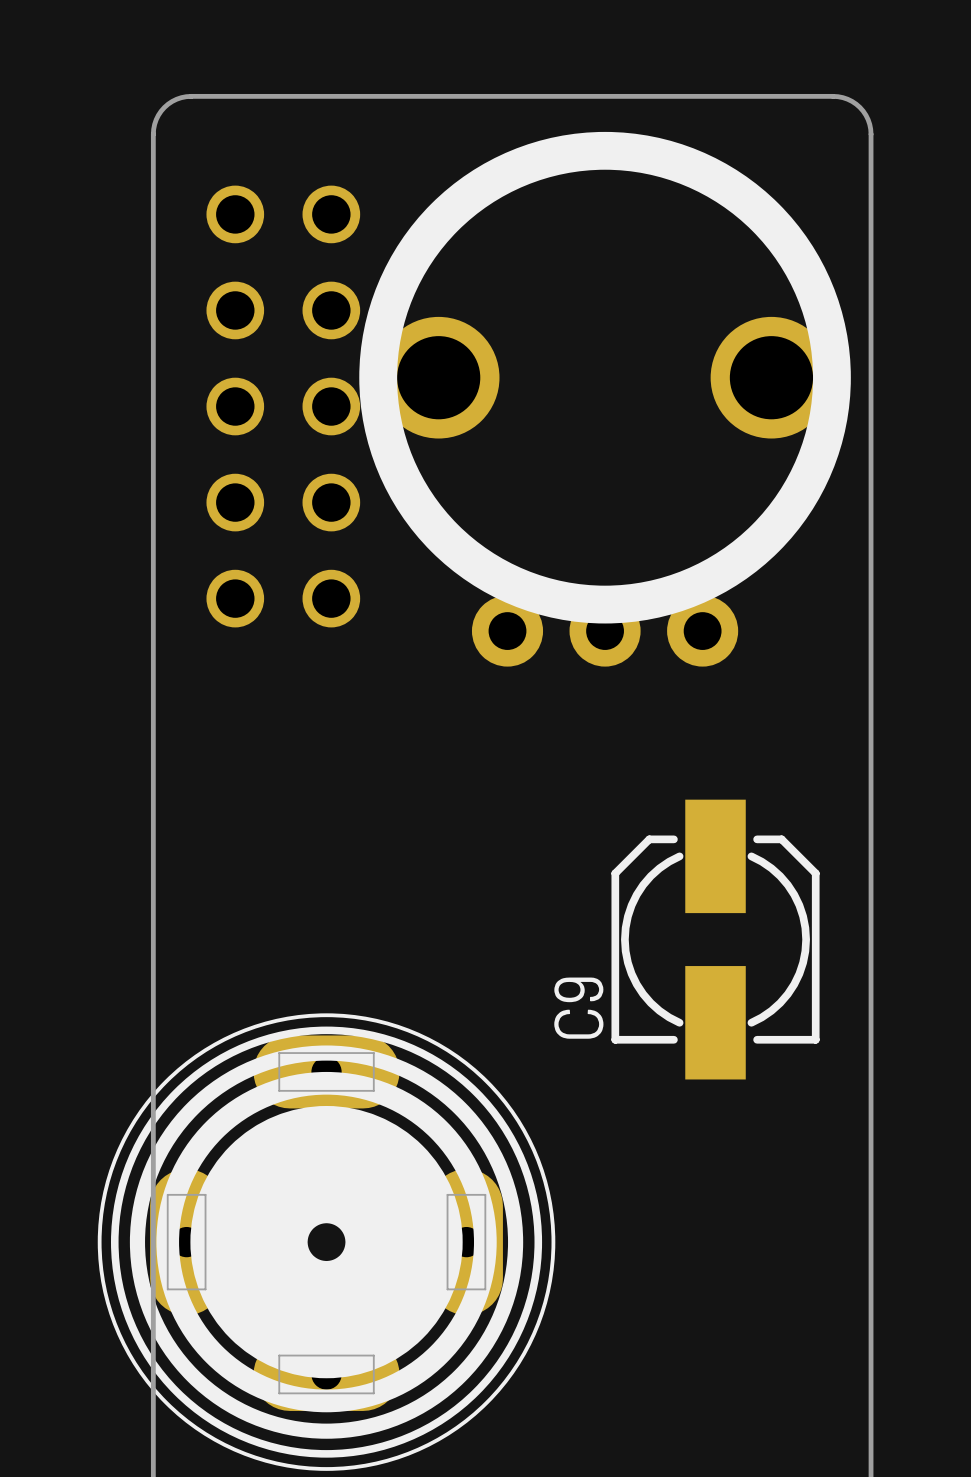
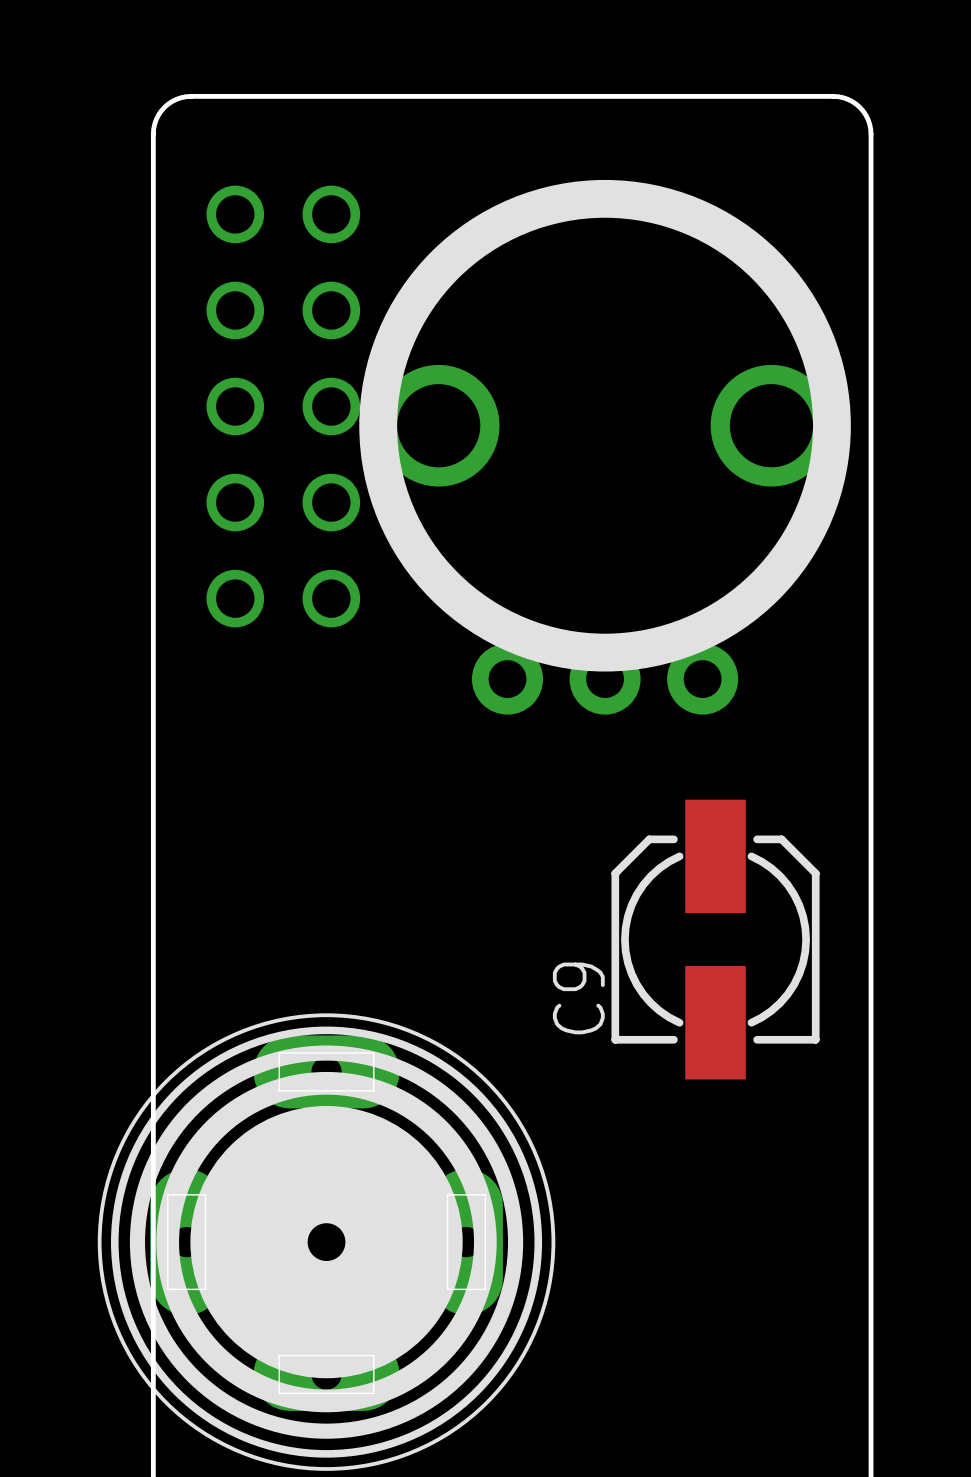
part position: (605, 399) -> (605, 447)

